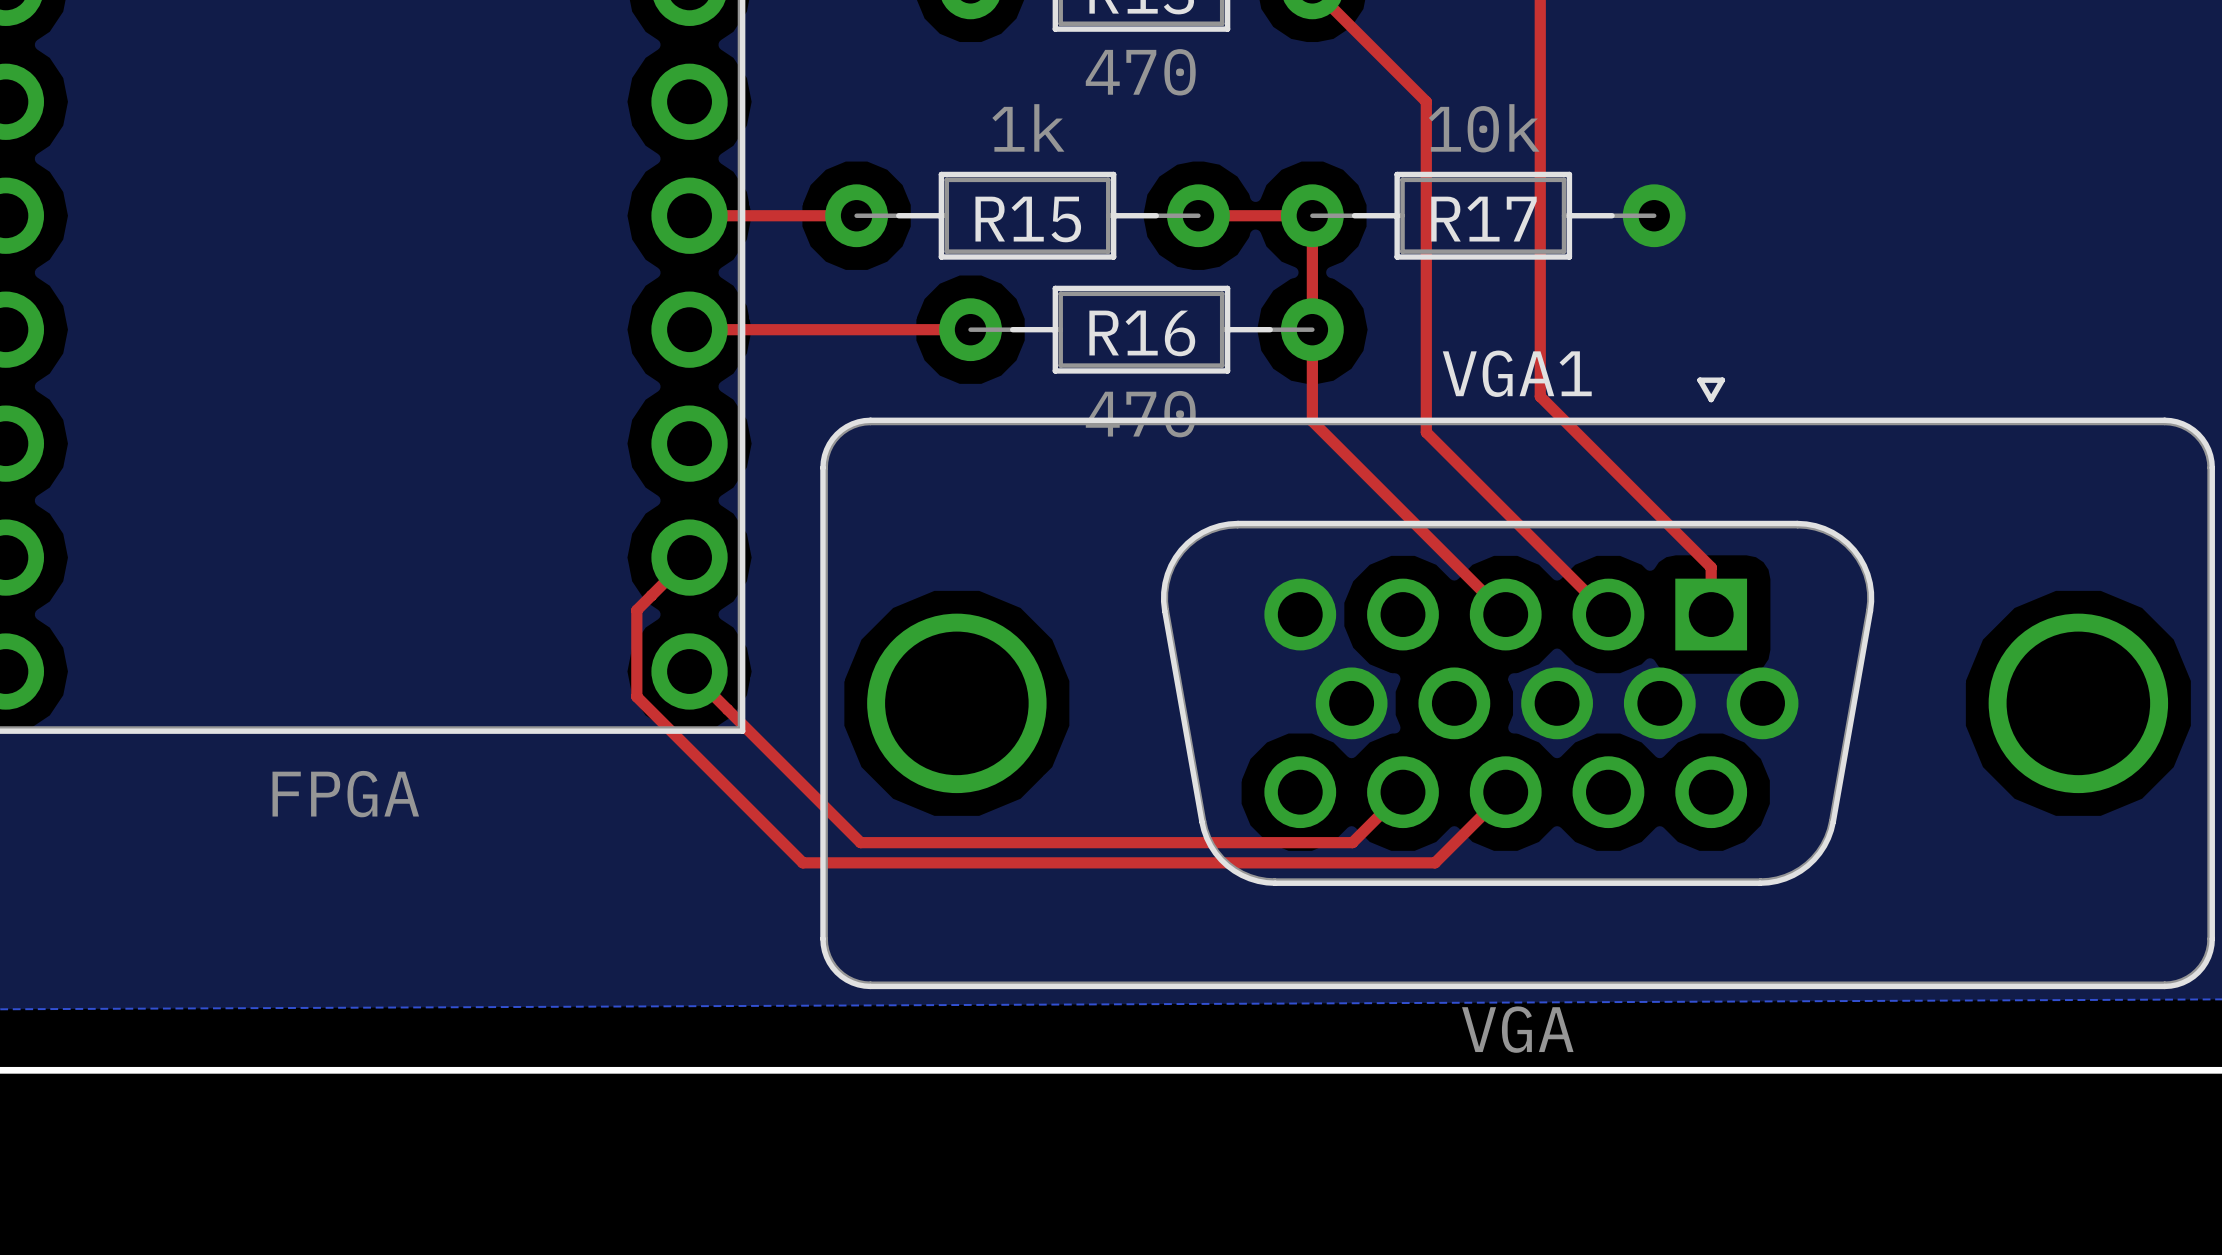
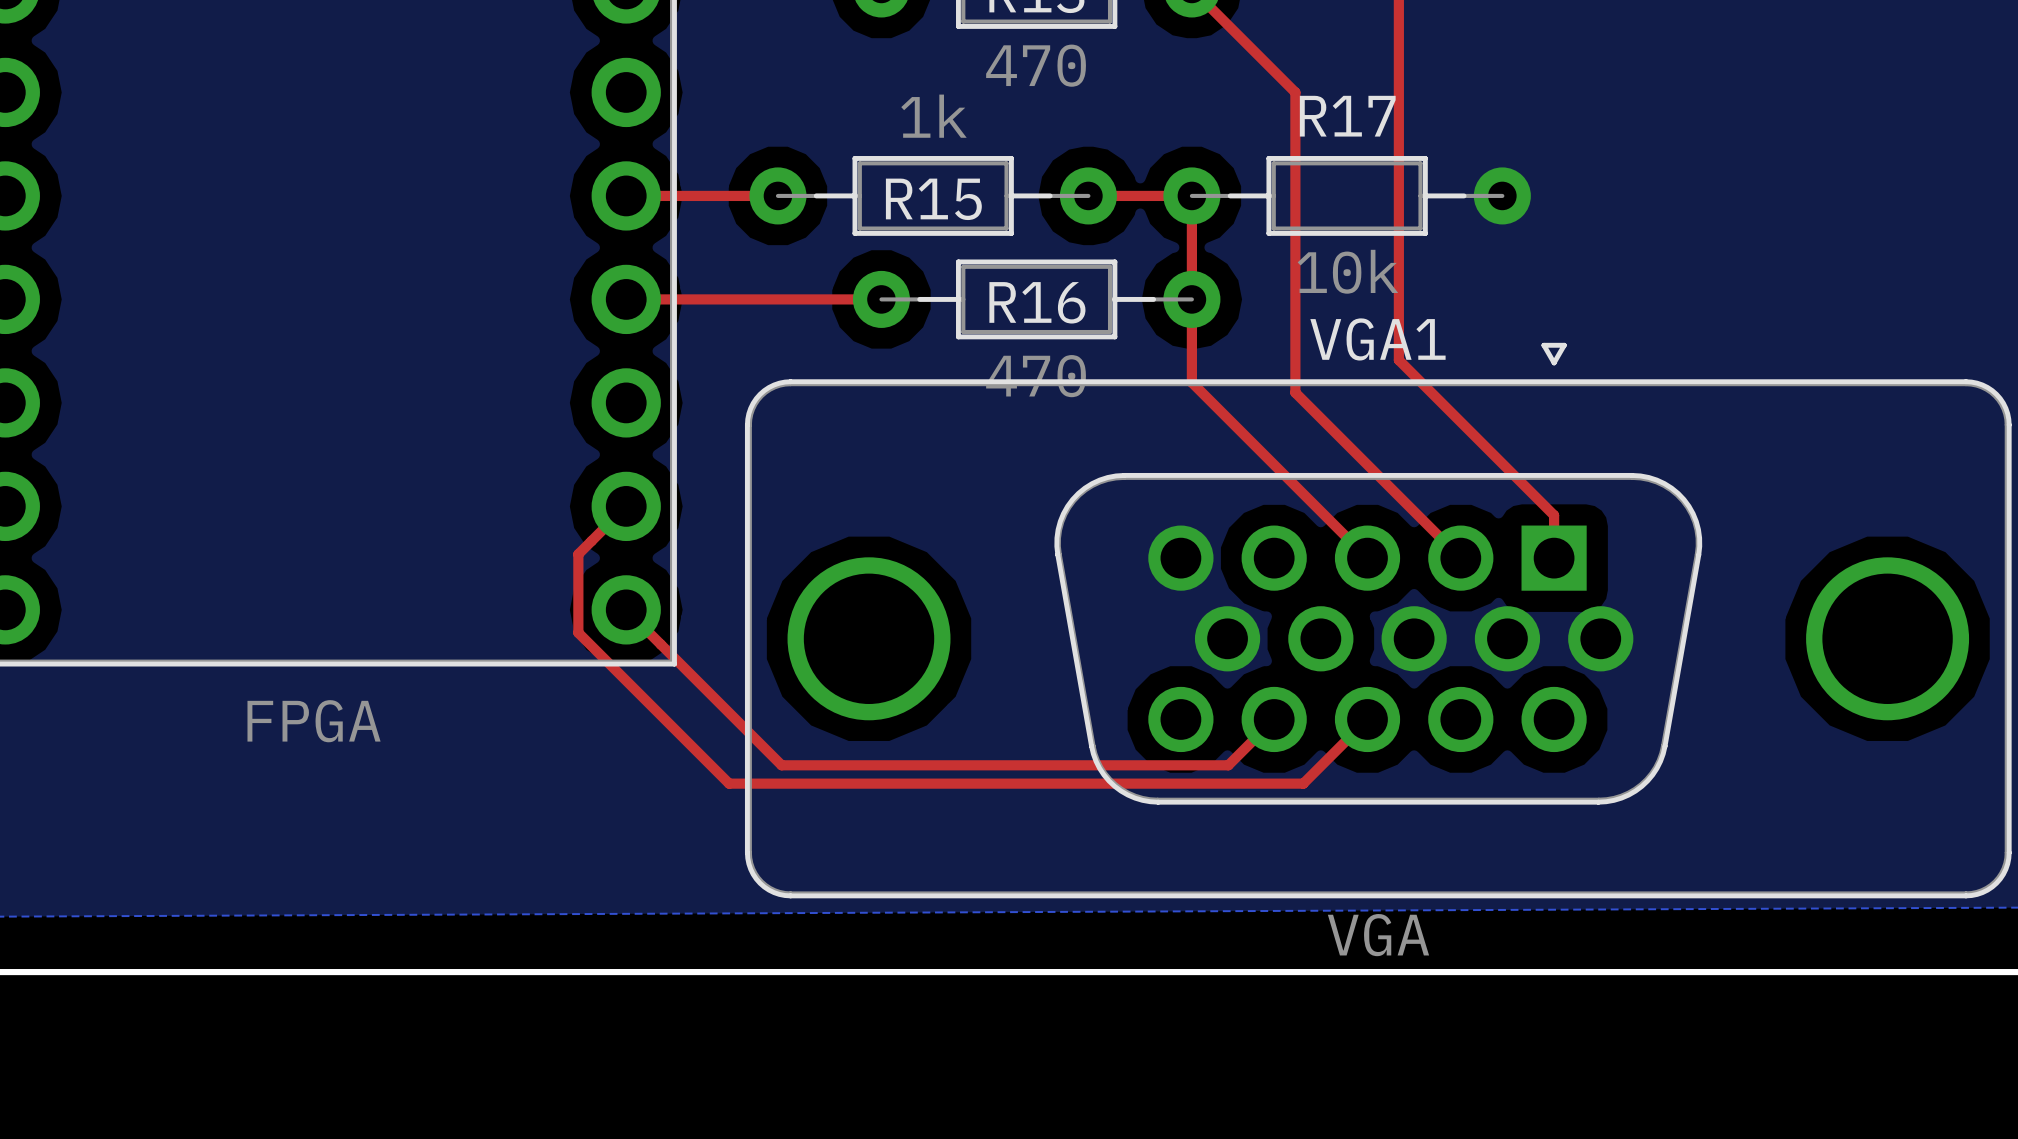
R17 value position: 10k (1484, 128) -> 10k (1347, 271)
R17 name position: R17 (1483, 219) -> R17 (1347, 116)

